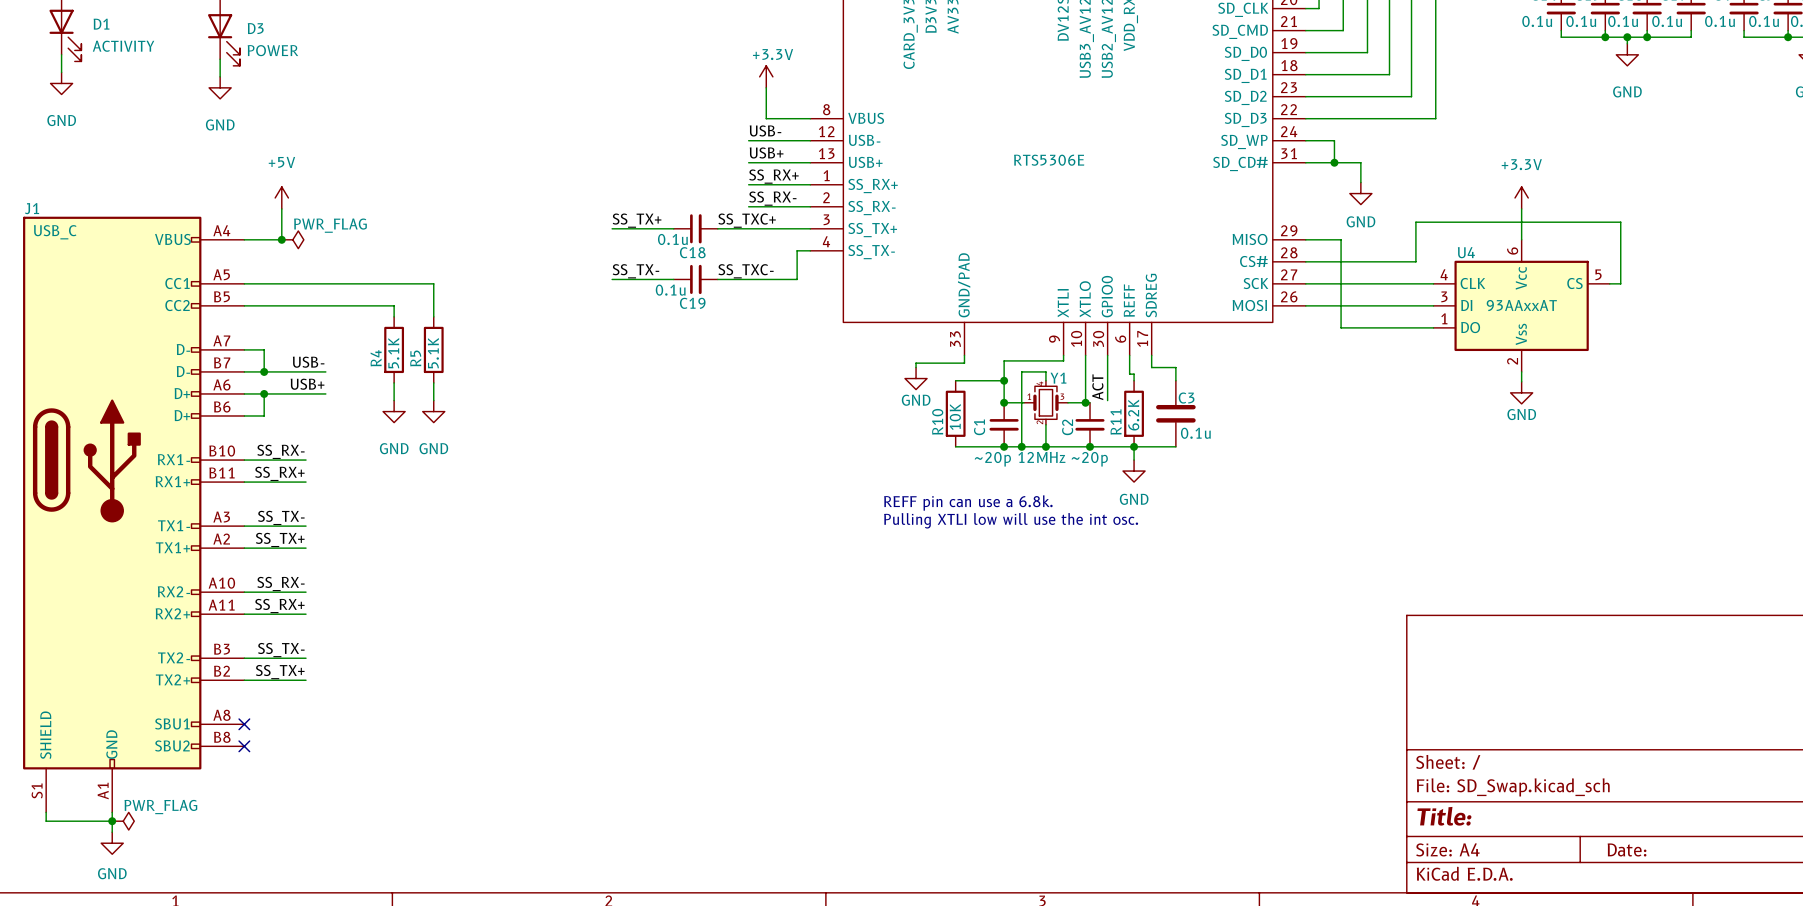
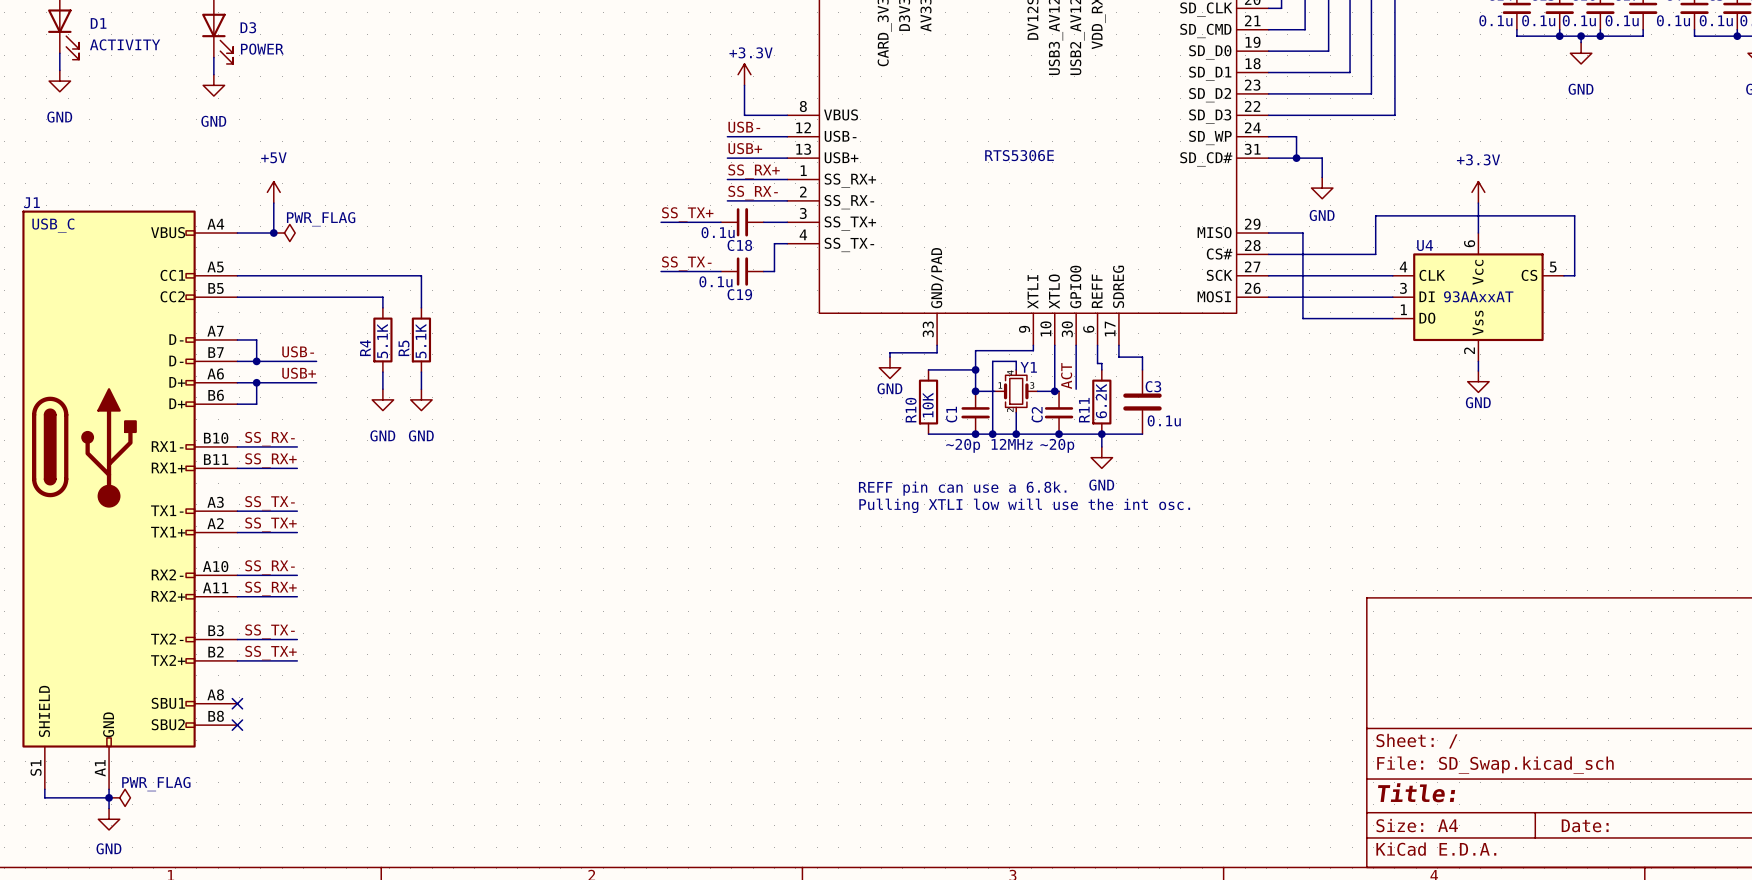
label position: SS_TX+ (637, 220) -> SS_TX+ (687, 214)
label: SS_TXC+ (747, 220) -> none
wire: (612, 228) (673, 228) -> none
C18 position: (695, 228) -> (742, 222)
label position: SS_TX- (635, 271) -> SS_TX- (686, 263)
label: SS_TXC- (746, 271) -> none
wire: (612, 279) (673, 279) -> none
C19 position: (695, 279) -> (742, 271)

